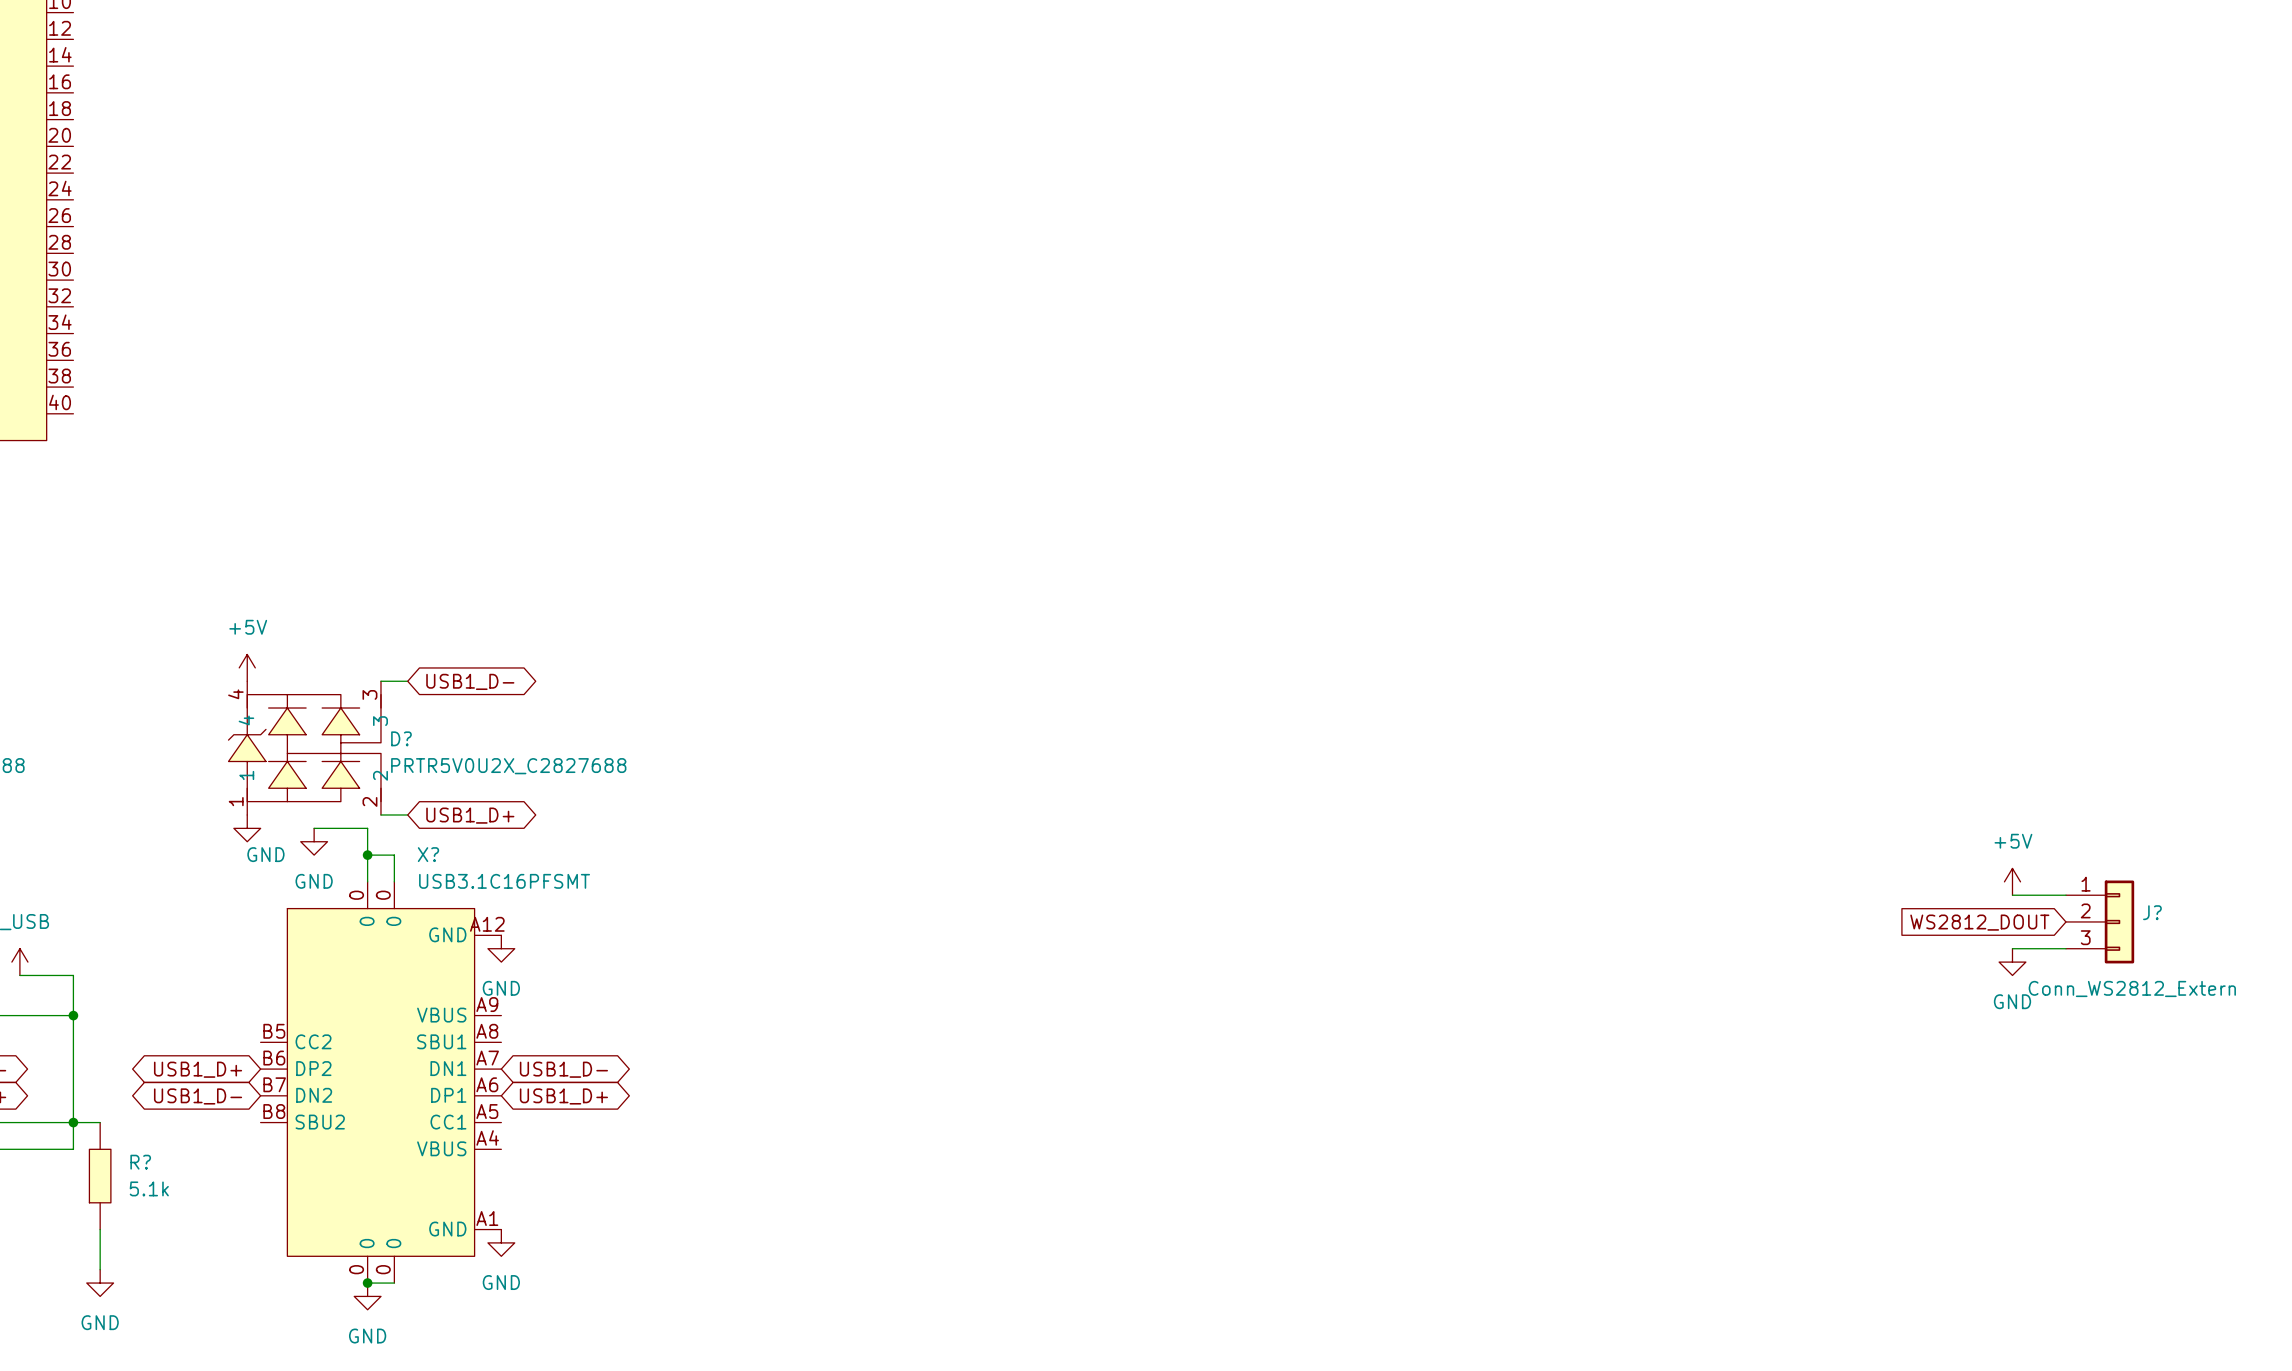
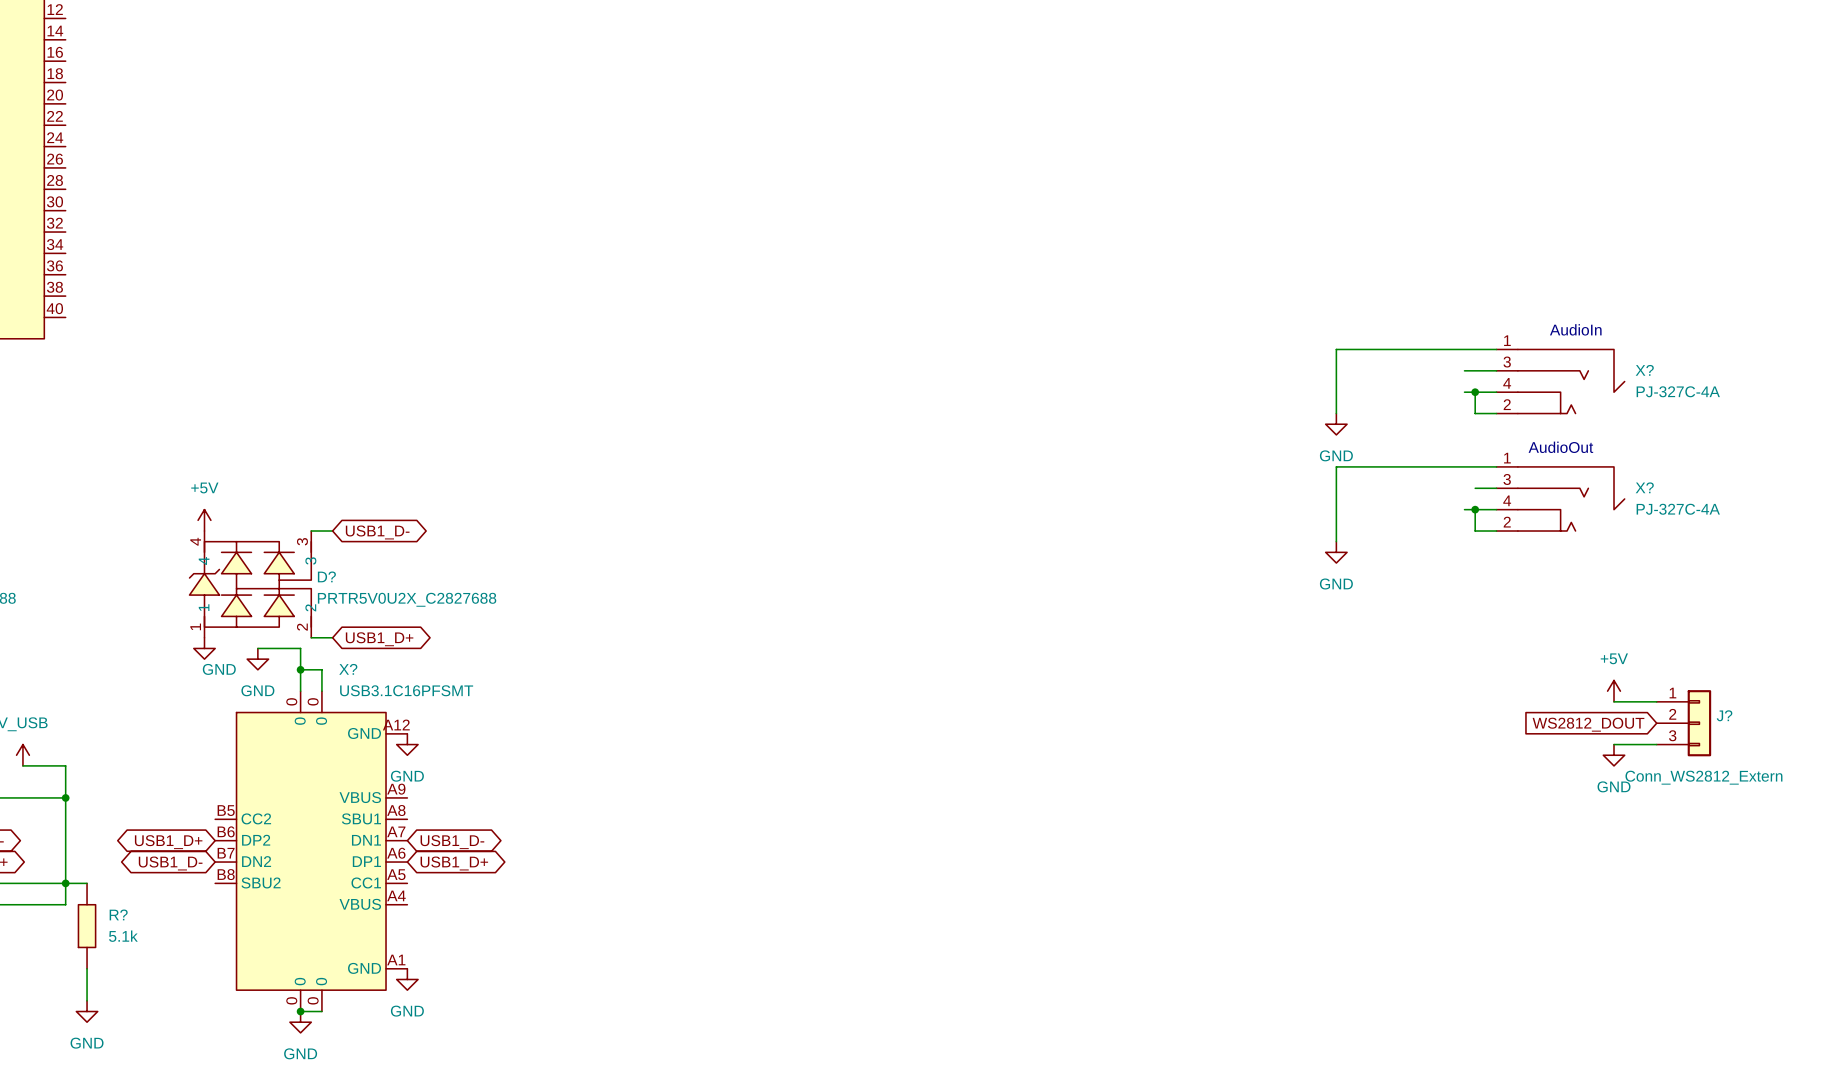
text: none -> AudioIn (1575, 329)
wire: none -> (1496, 349) (1336, 349) (1336, 413)
wire: none -> (1464, 370) (1496, 370)
X?: none -> PJ-327C-4A (1560, 381)
wire: none -> (1464, 392) (1496, 392)
wire: none -> (1475, 392) (1475, 413) (1496, 413)
junction: none -> (1475, 392)
power symbol: none -> GND (1336, 424)
text: none -> AudioOut (1560, 447)
wire: none -> (1496, 466) (1336, 466) (1336, 541)
wire: none -> (1475, 488) (1496, 488)
X?: none -> PJ-327C-4A (1560, 498)
wire: none -> (1464, 509) (1496, 509)
wire: none -> (1475, 509) (1475, 531) (1496, 531)
junction: none -> (1475, 509)
power symbol: none -> GND (1336, 552)

